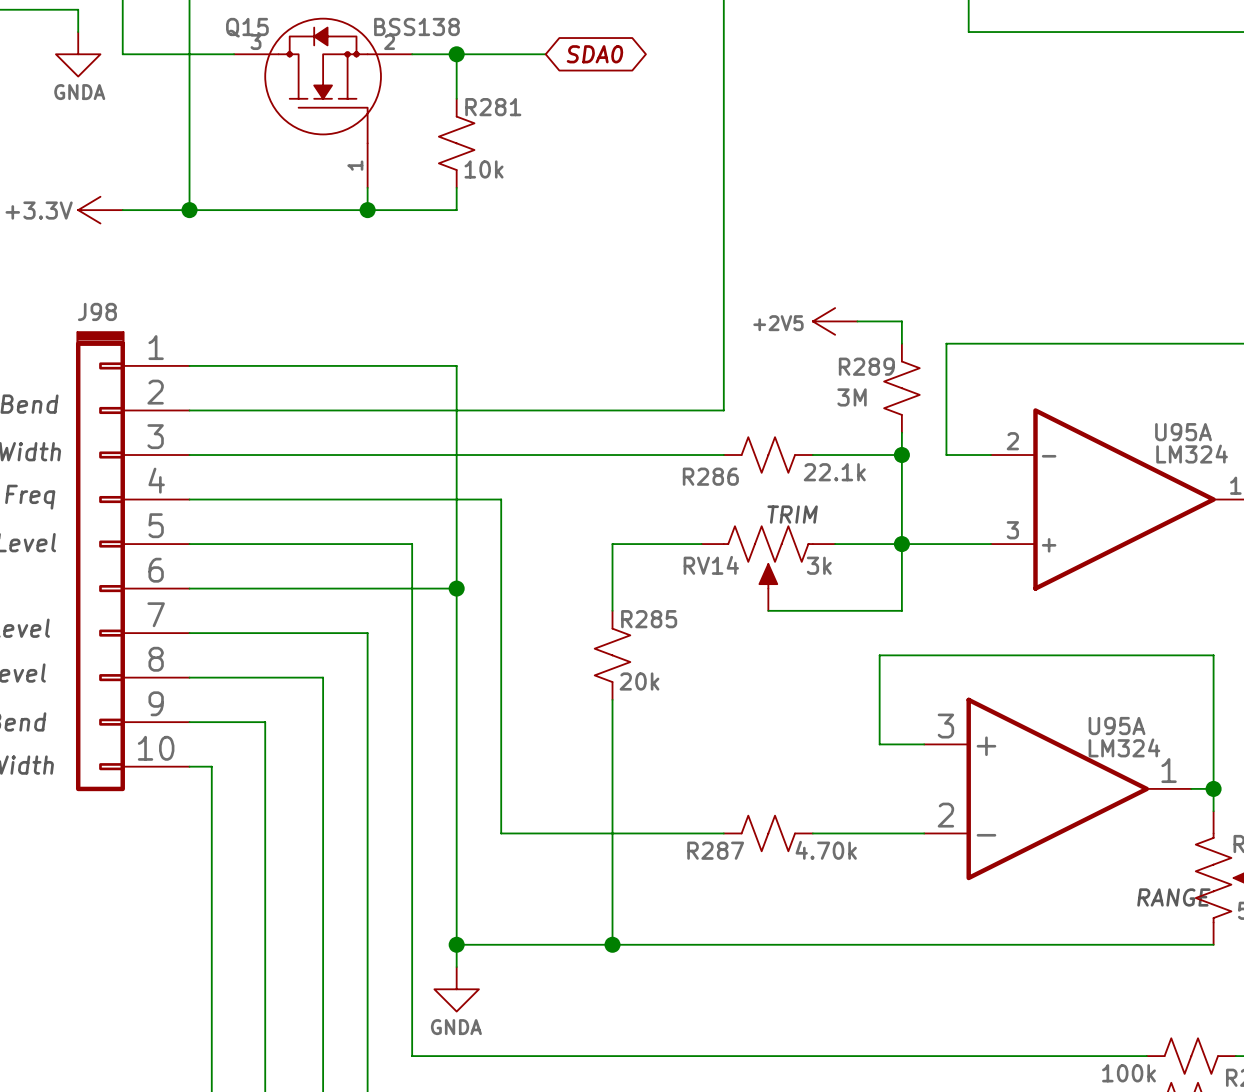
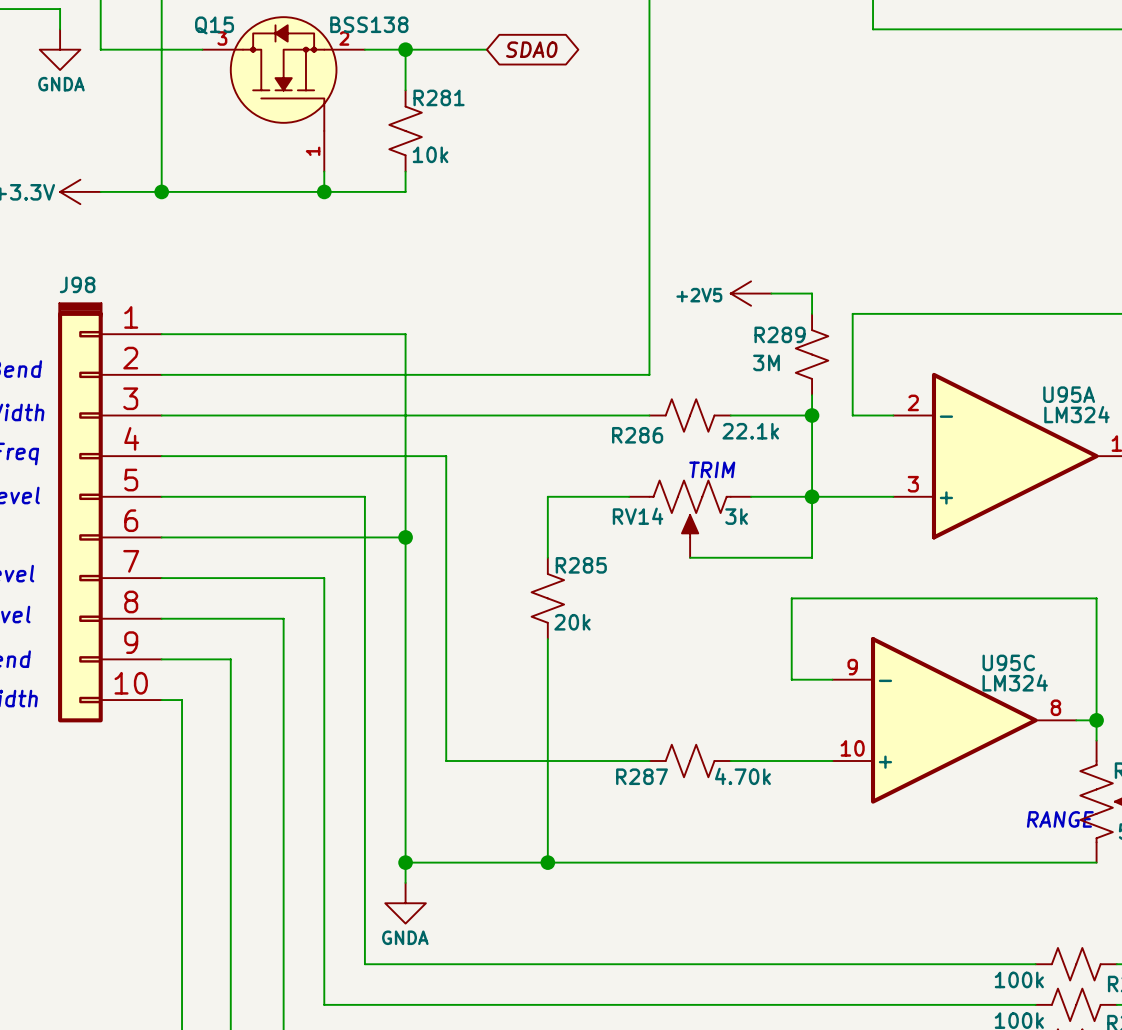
U95A pin number: 3 (945, 726) -> 9 (852, 667)
U95A name: U95A (1117, 726) -> U95C (1008, 662)
U95A pin name: + (986, 746) -> - (885, 680)
U95A pin number: 1 (1169, 770) -> 8 (1055, 707)
U95A pin number: 2 (945, 815) -> 10 (852, 748)
U95A pin name: - (986, 835) -> + (885, 762)

